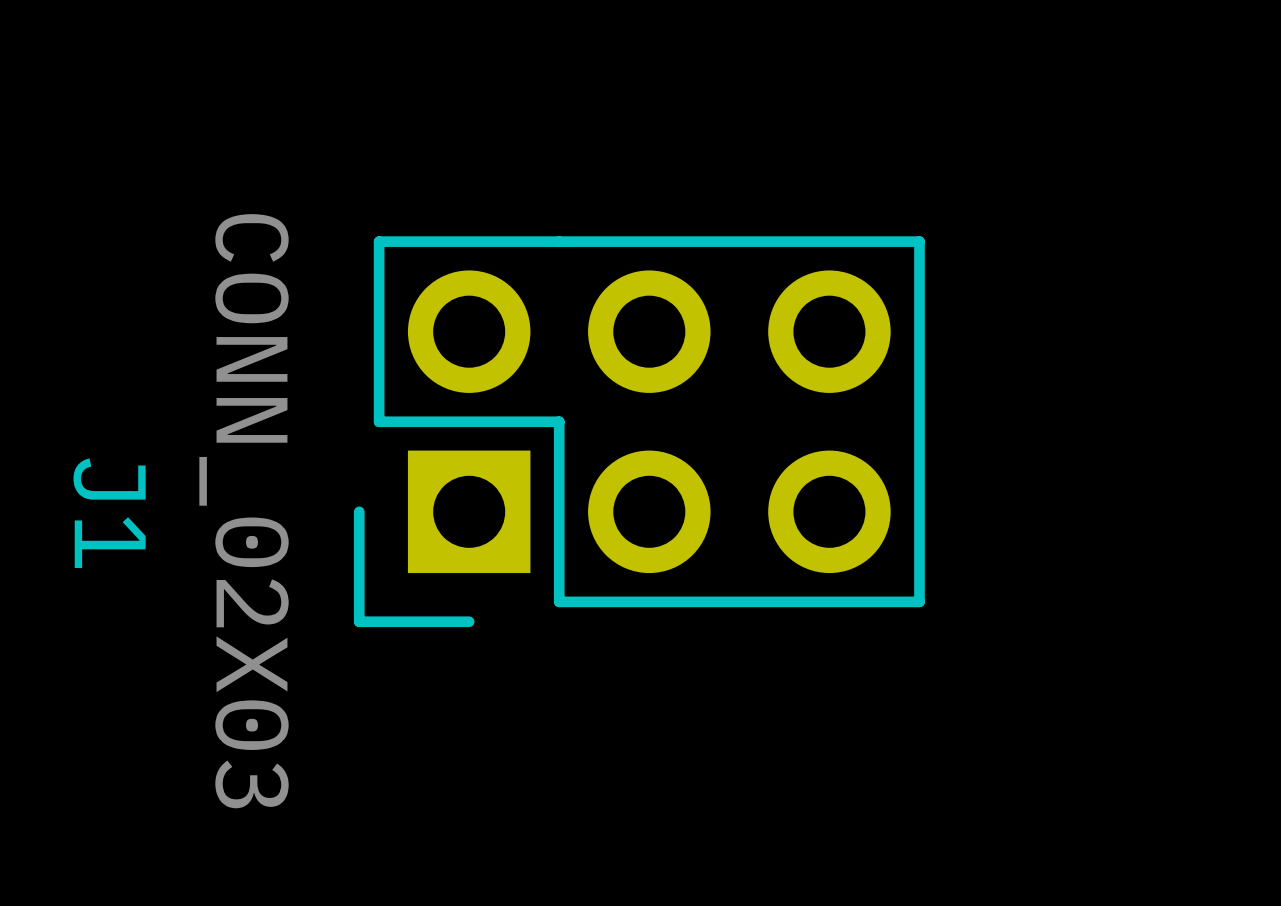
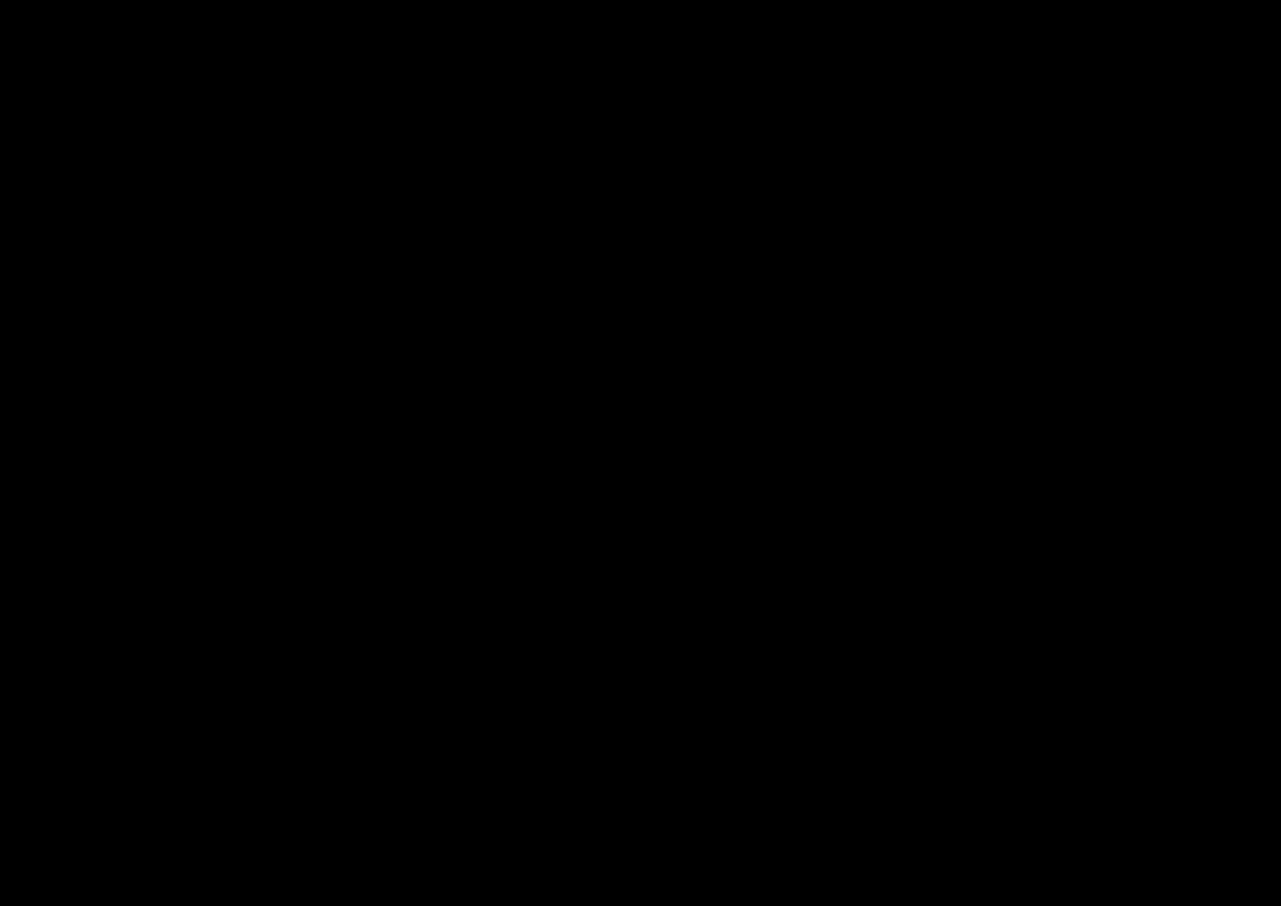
J1: CONN_02X03 (639, 431) -> none

